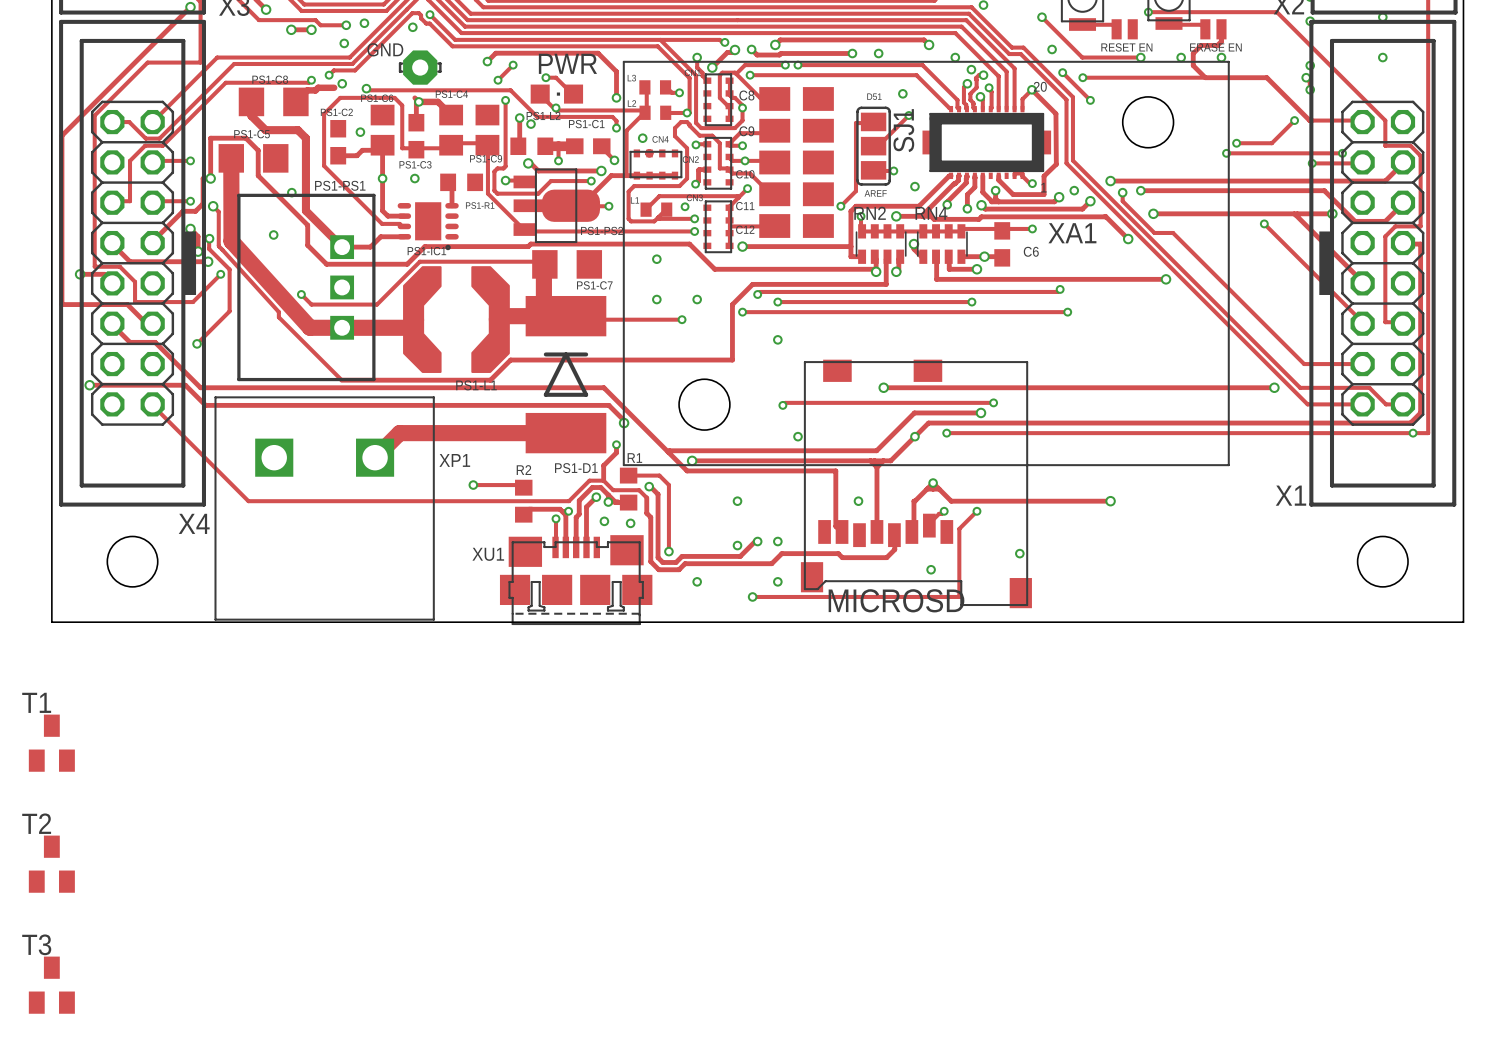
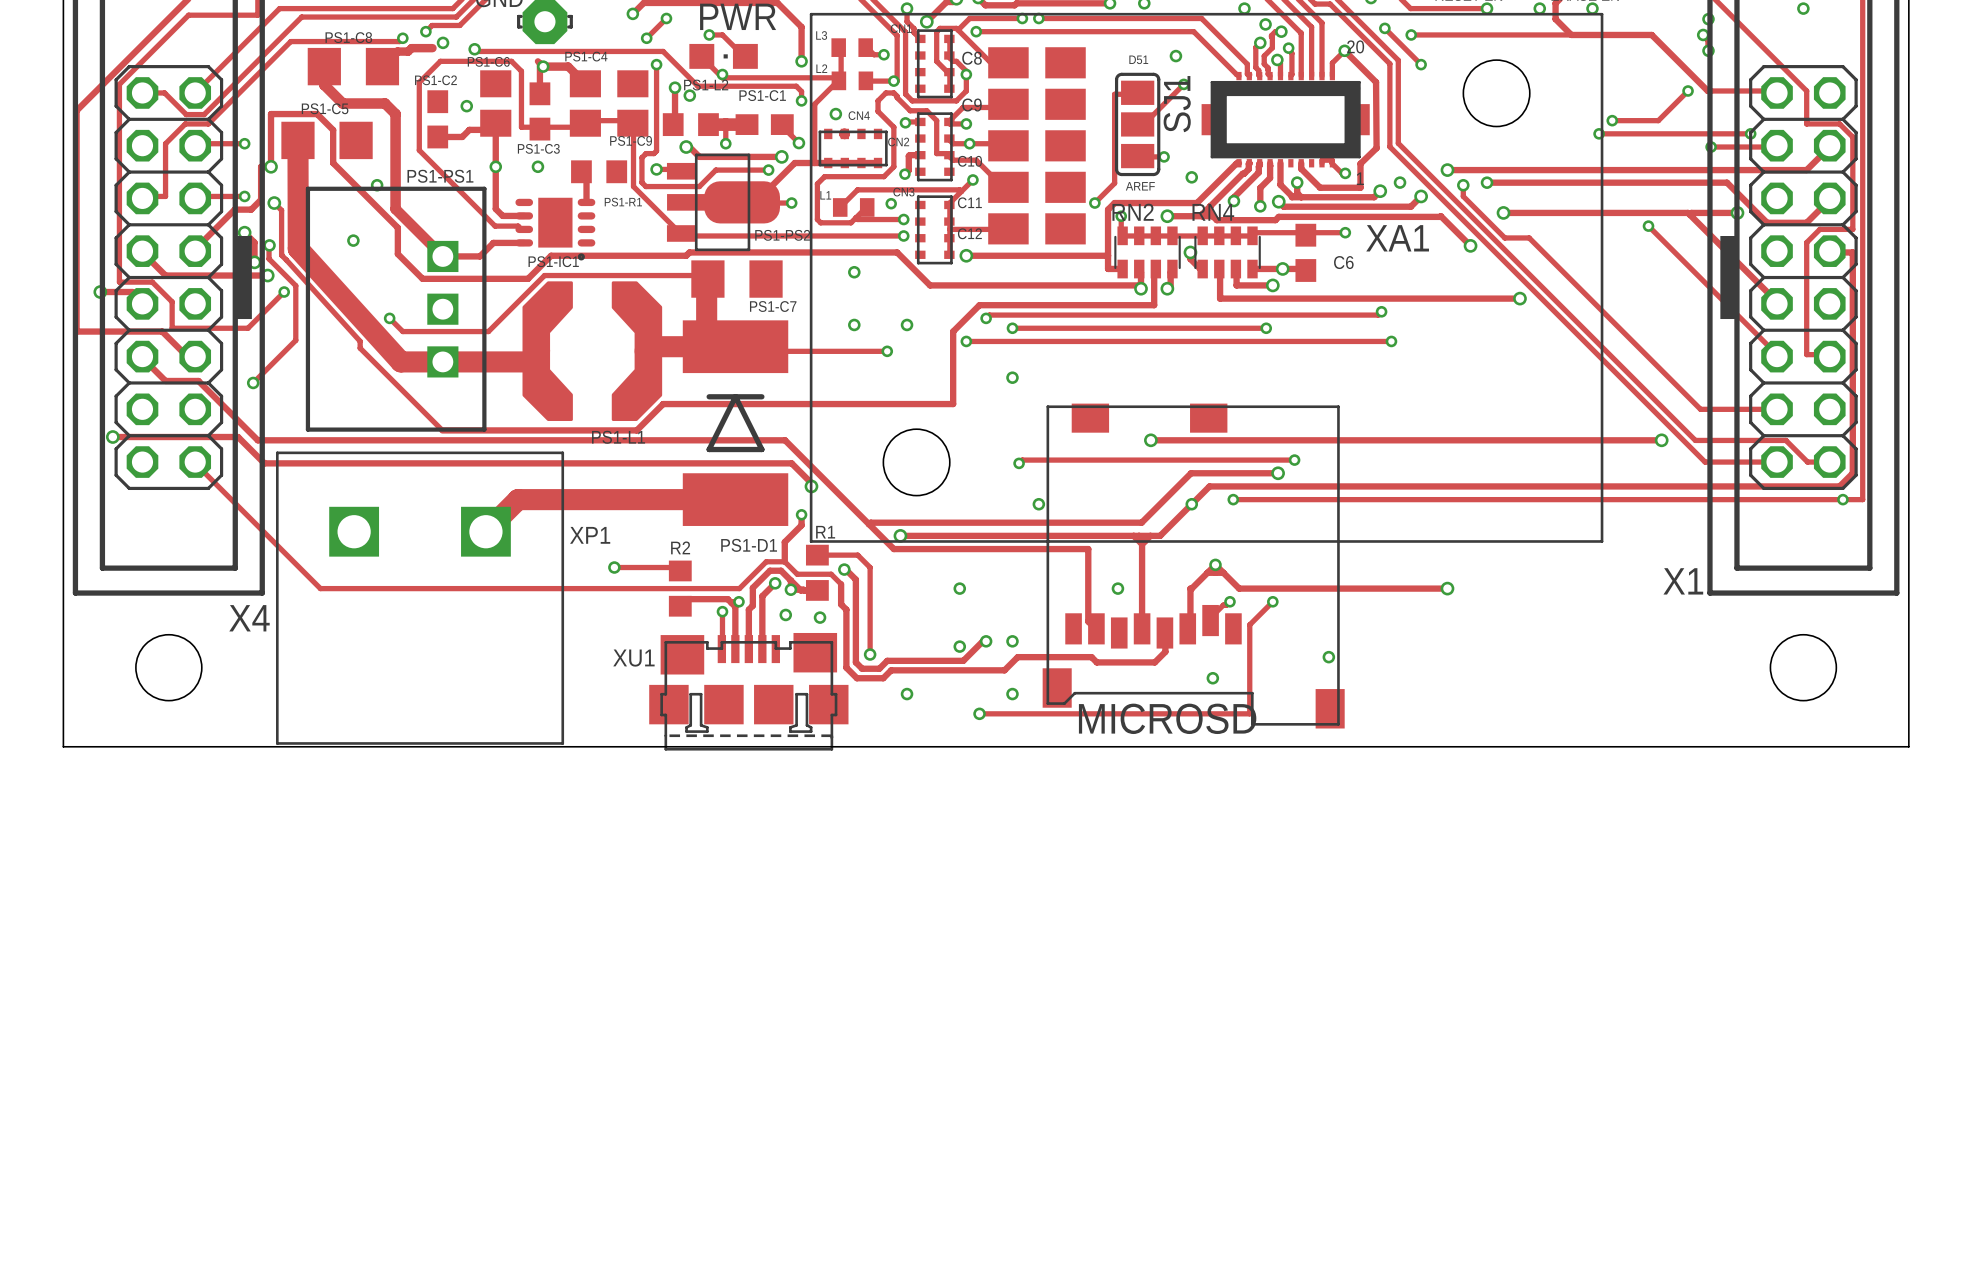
T1: (51, 743) -> none
T2: (51, 864) -> none
T3: (51, 985) -> none

